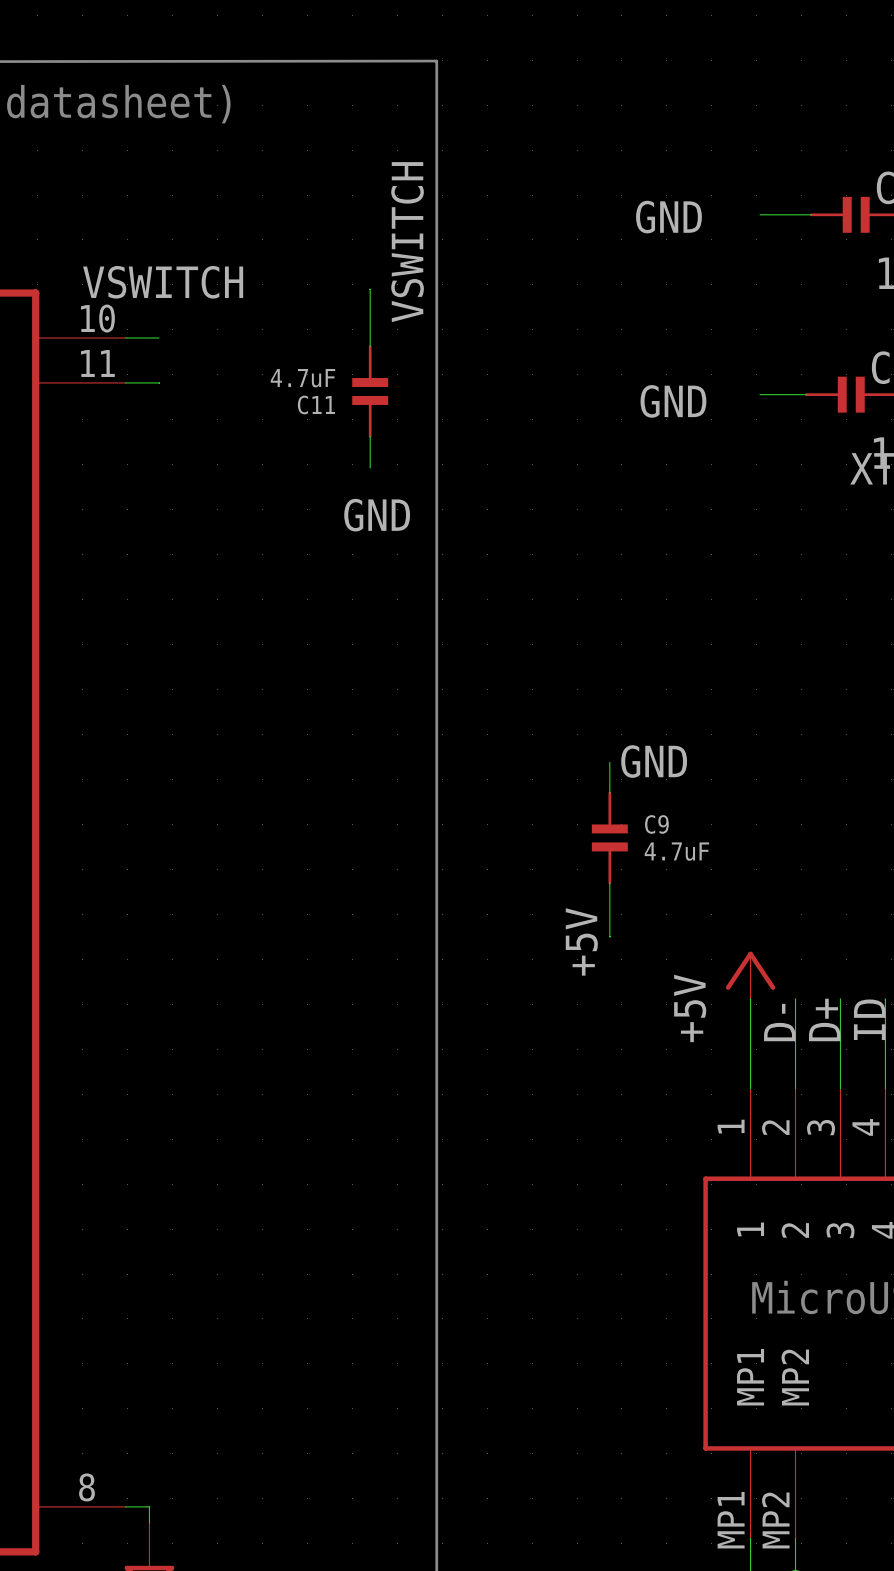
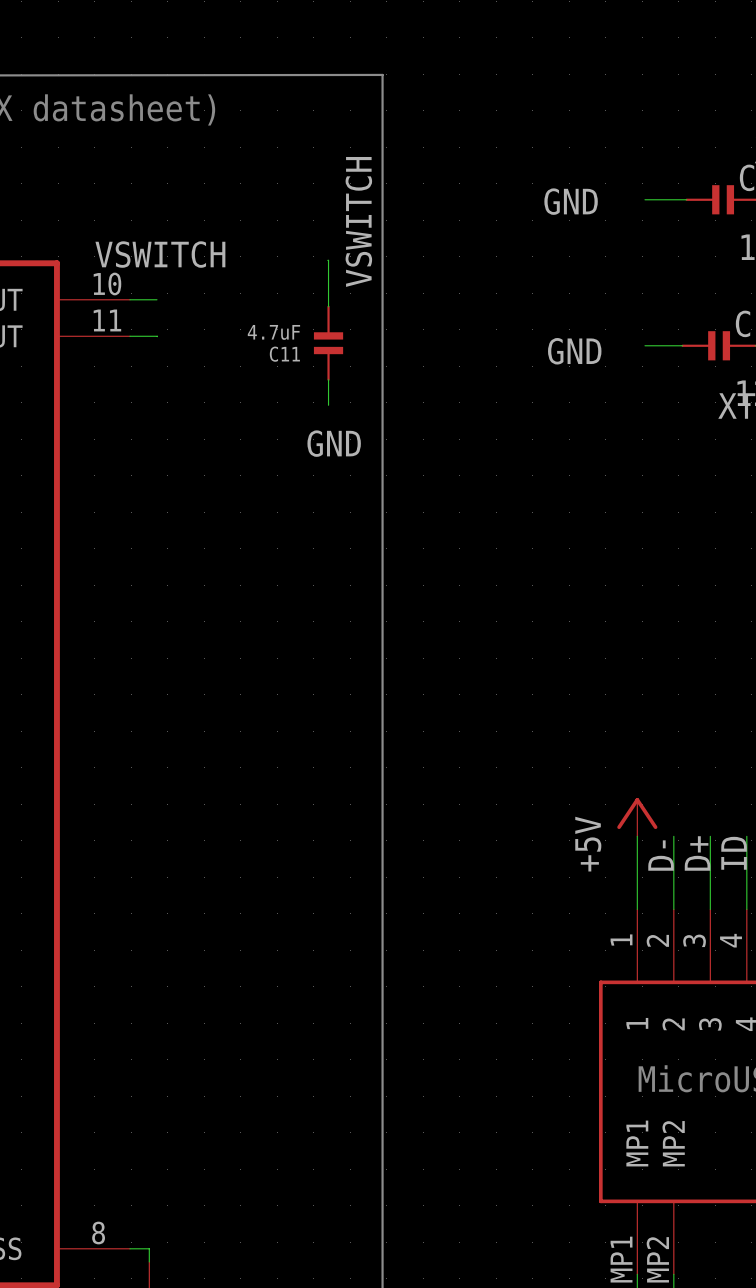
label: GND (654, 761) -> none
wire: (609, 762) (609, 792) -> none
C9: 4.7uF (609, 837) -> none
wire: (609, 882) (610, 936) -> none
label: +5V (581, 941) -> none

